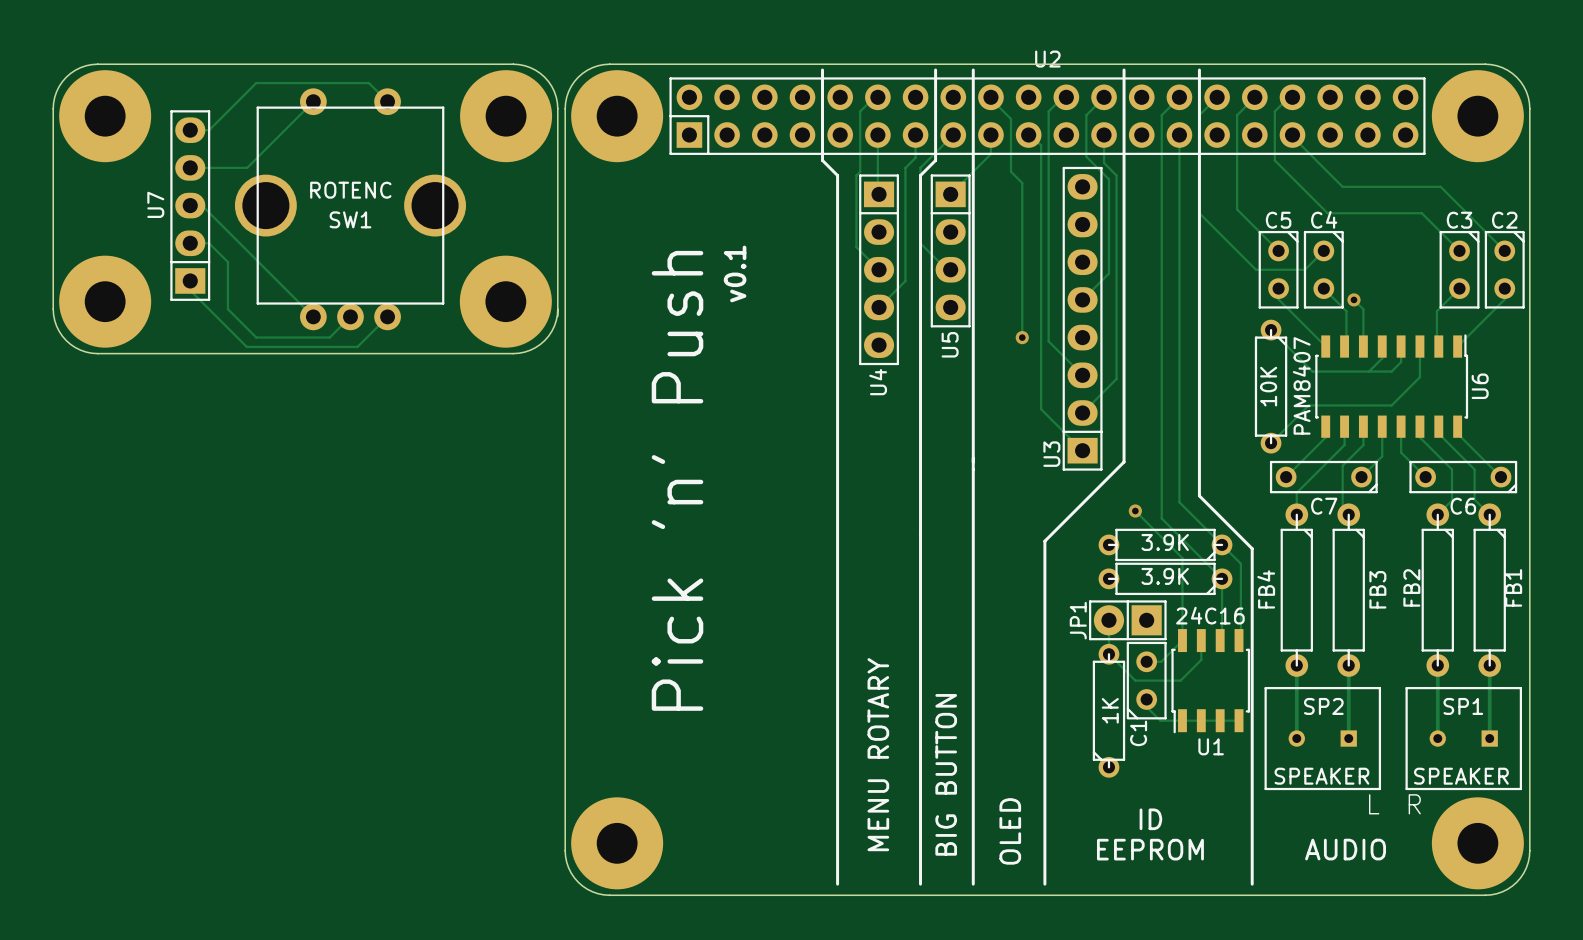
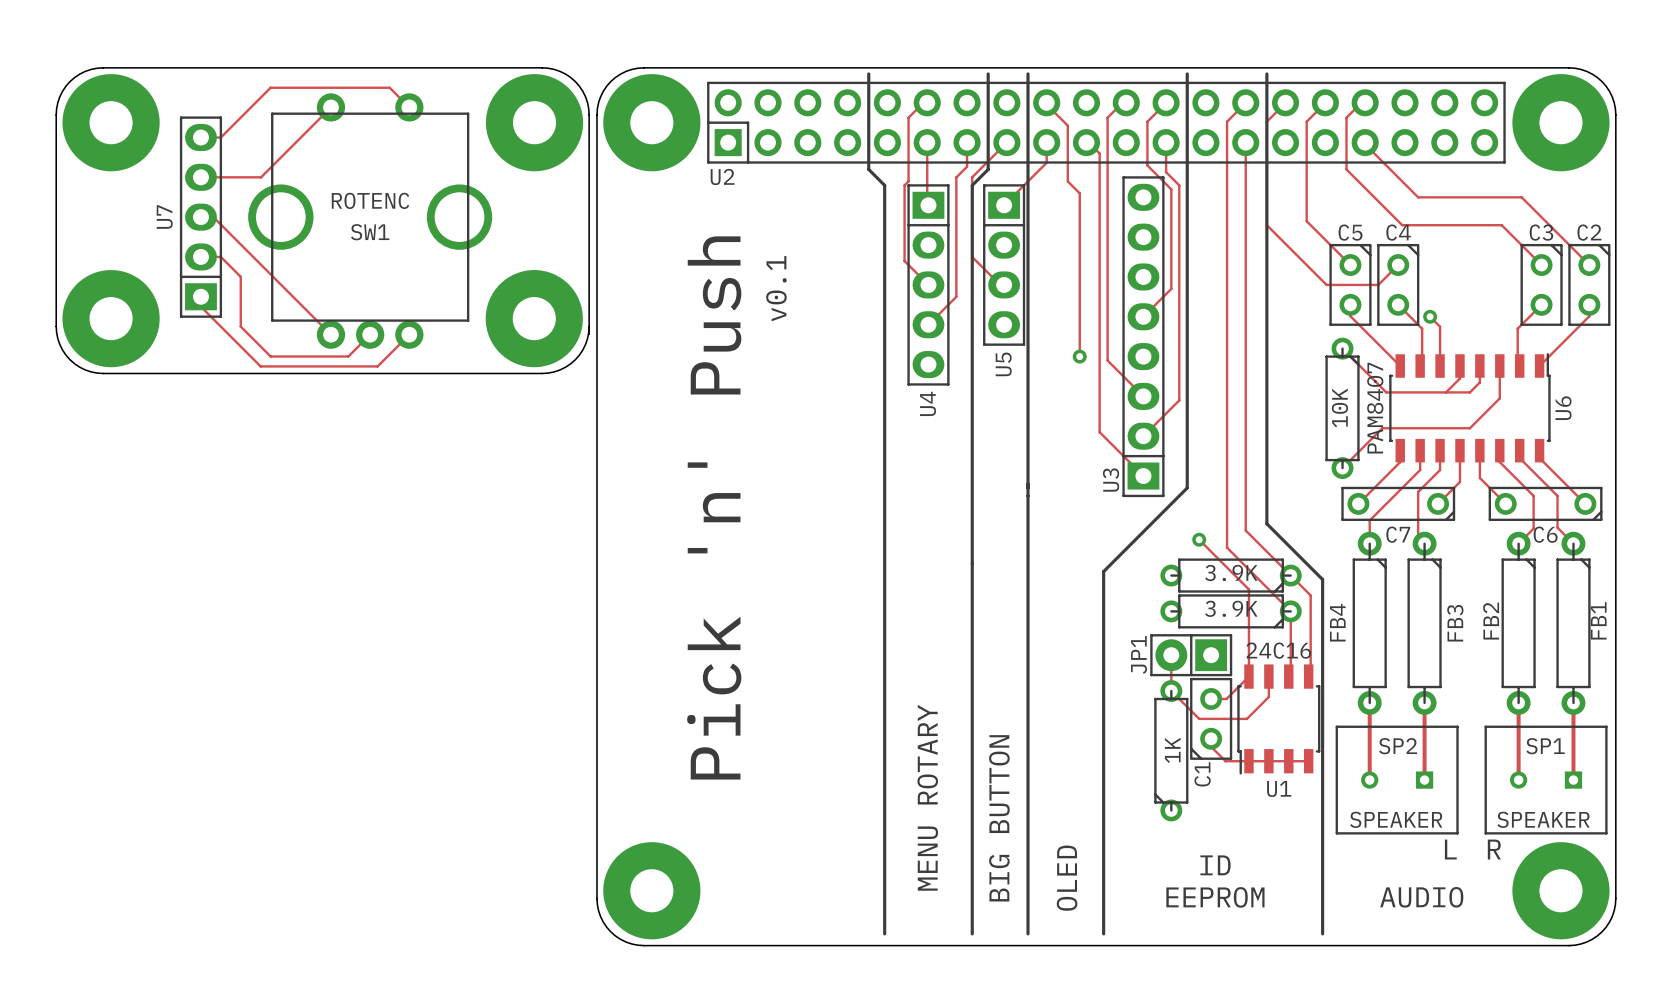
U2 name position: U2 (1047, 59) -> U2 (722, 176)

